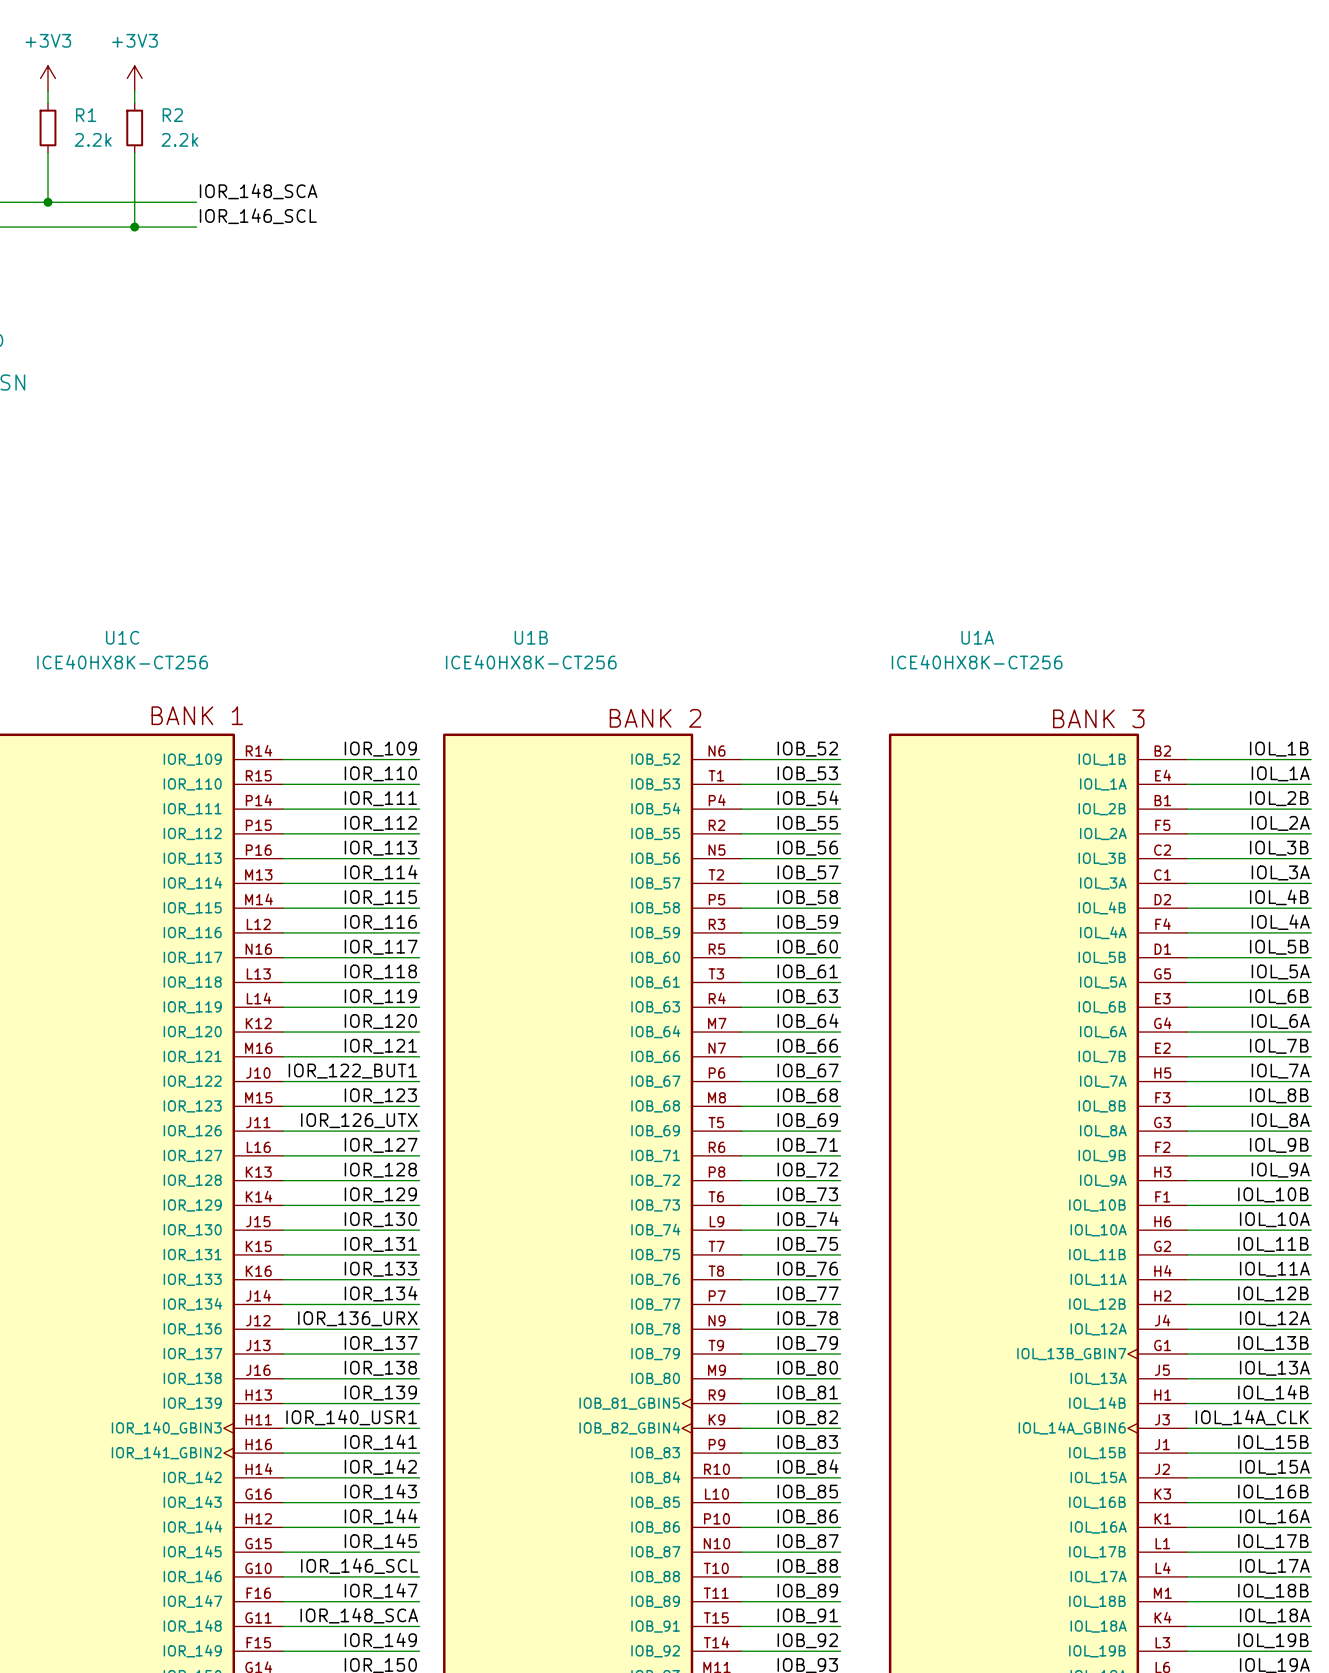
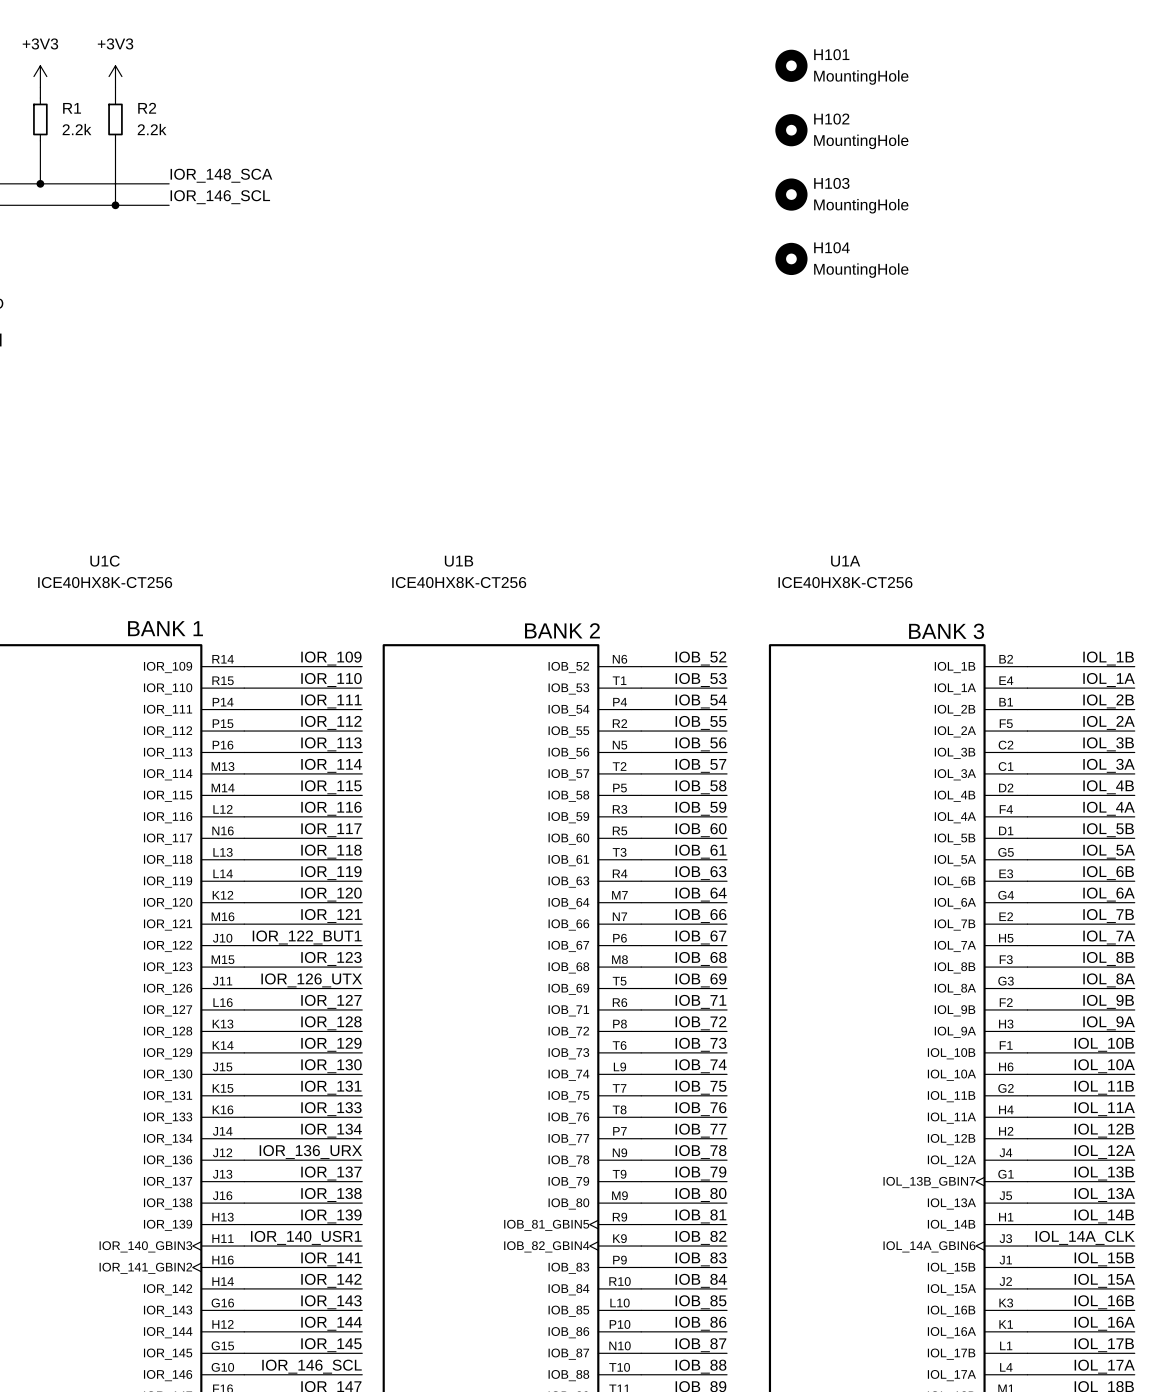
H101: none -> MountingHole (791, 65)
H102: none -> MountingHole (791, 130)
H103: none -> MountingHole (791, 194)
H104: none -> MountingHole (791, 258)

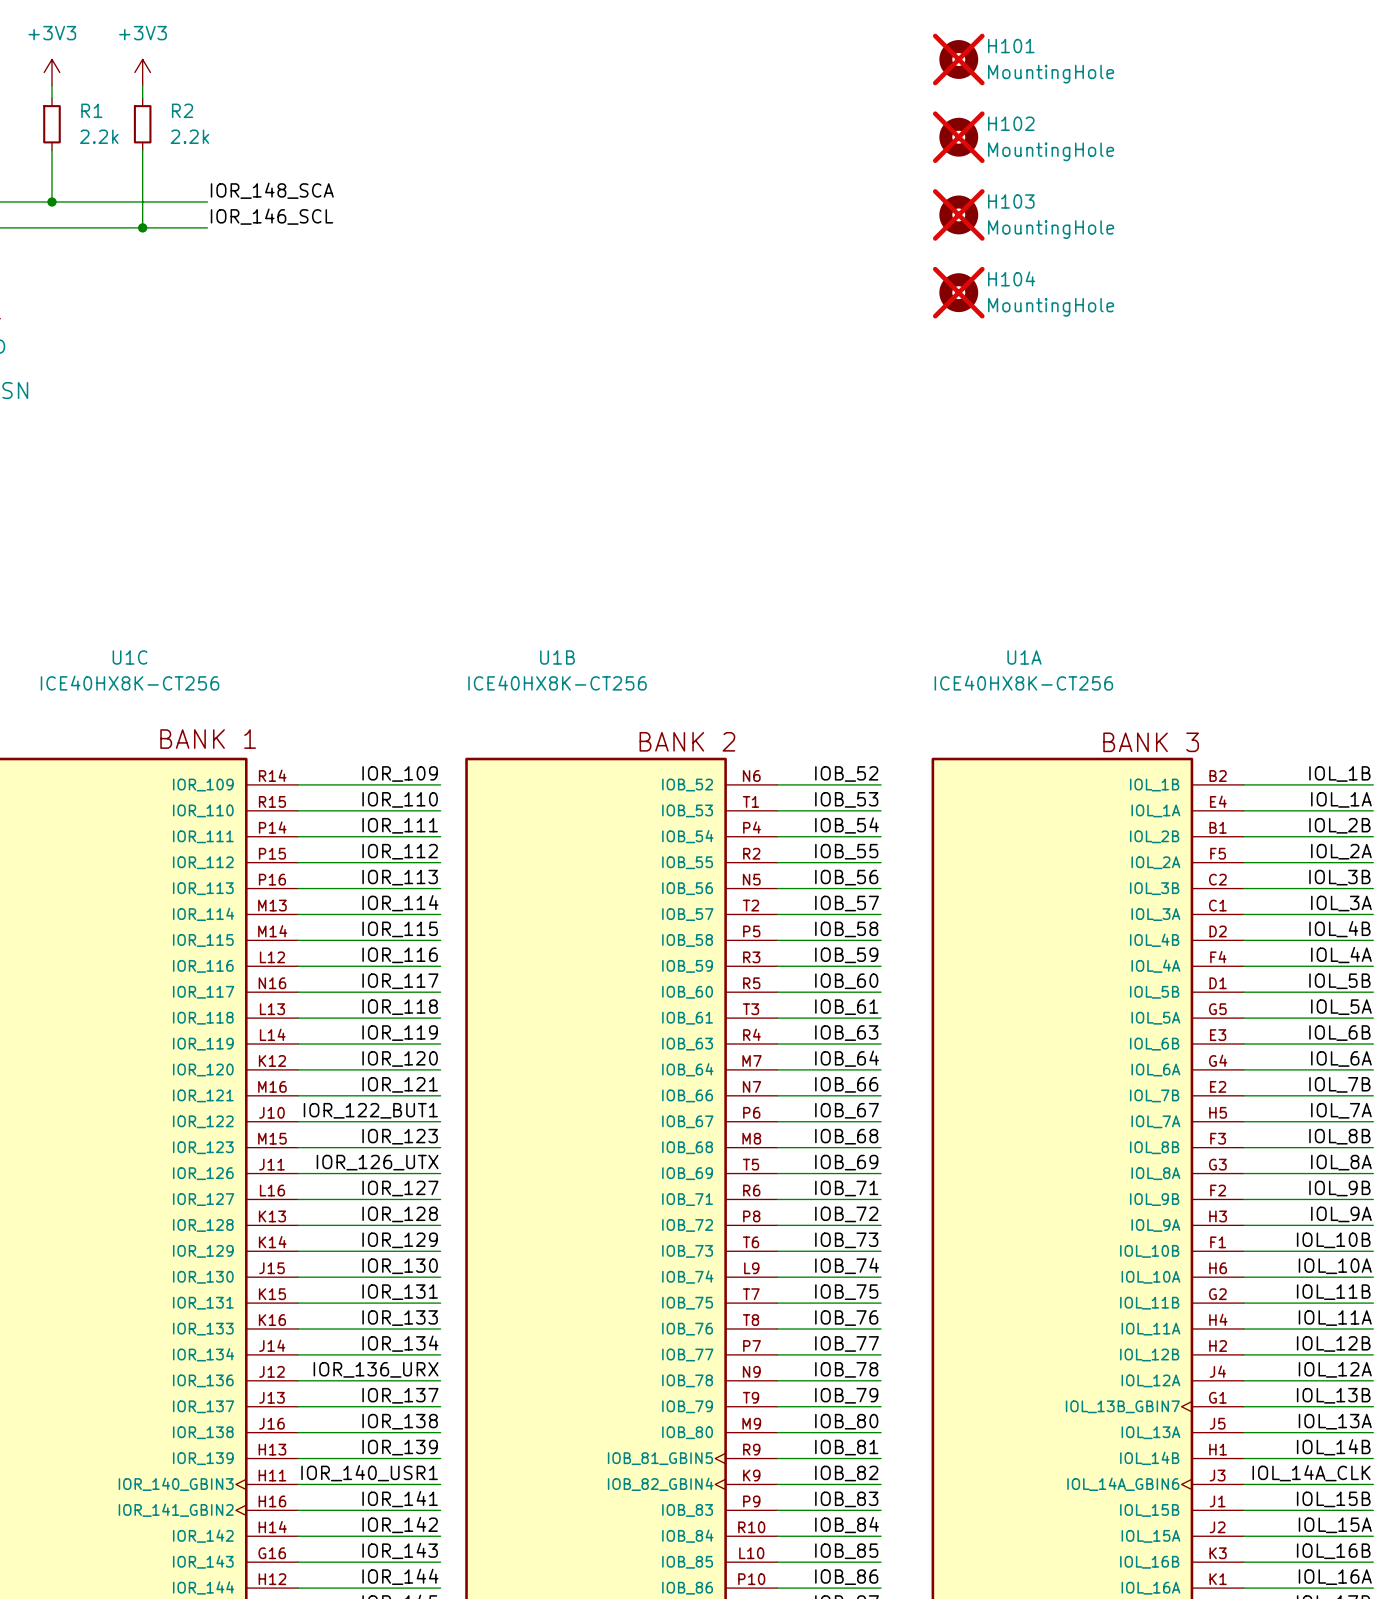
H101 do-not-place cross: none -> (958, 59)
H102 do-not-place cross: none -> (958, 137)
H103 do-not-place cross: none -> (958, 214)
H104 do-not-place cross: none -> (958, 292)

